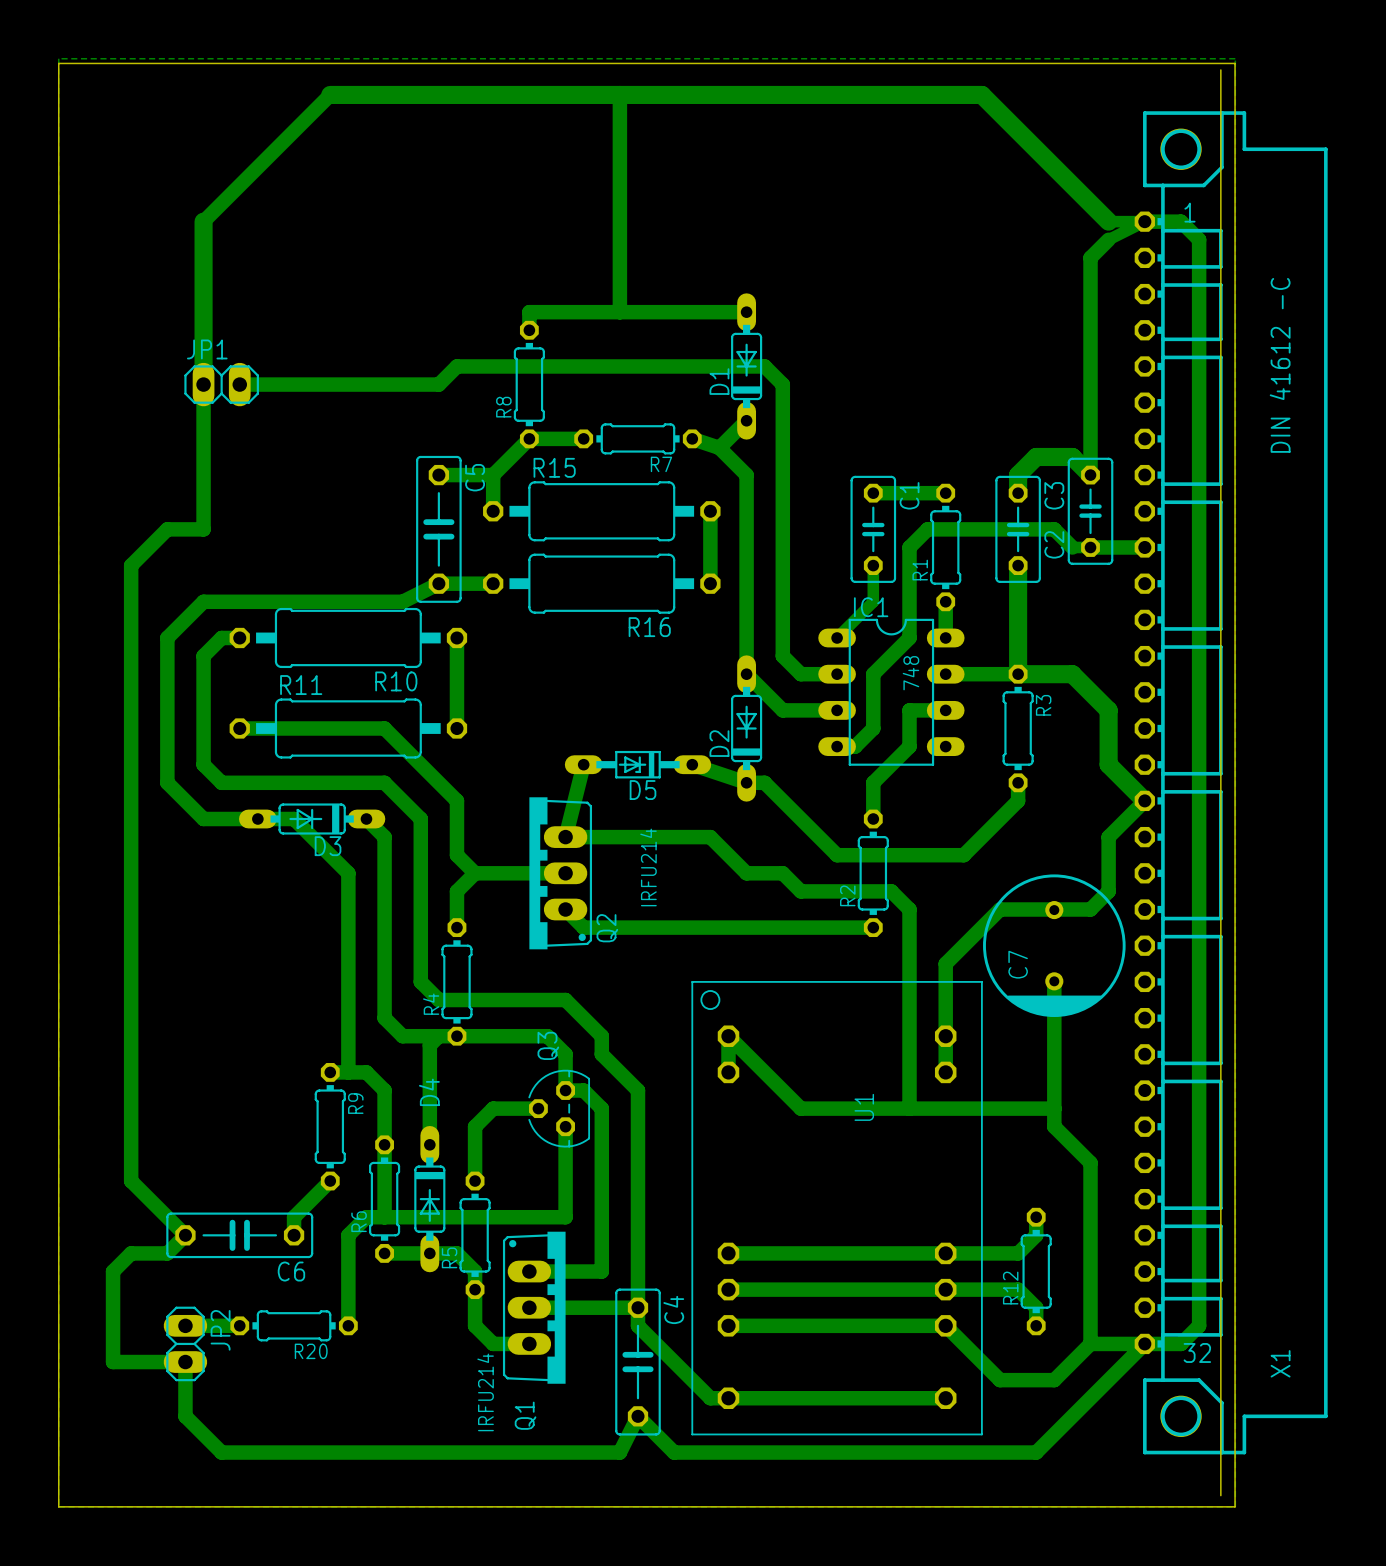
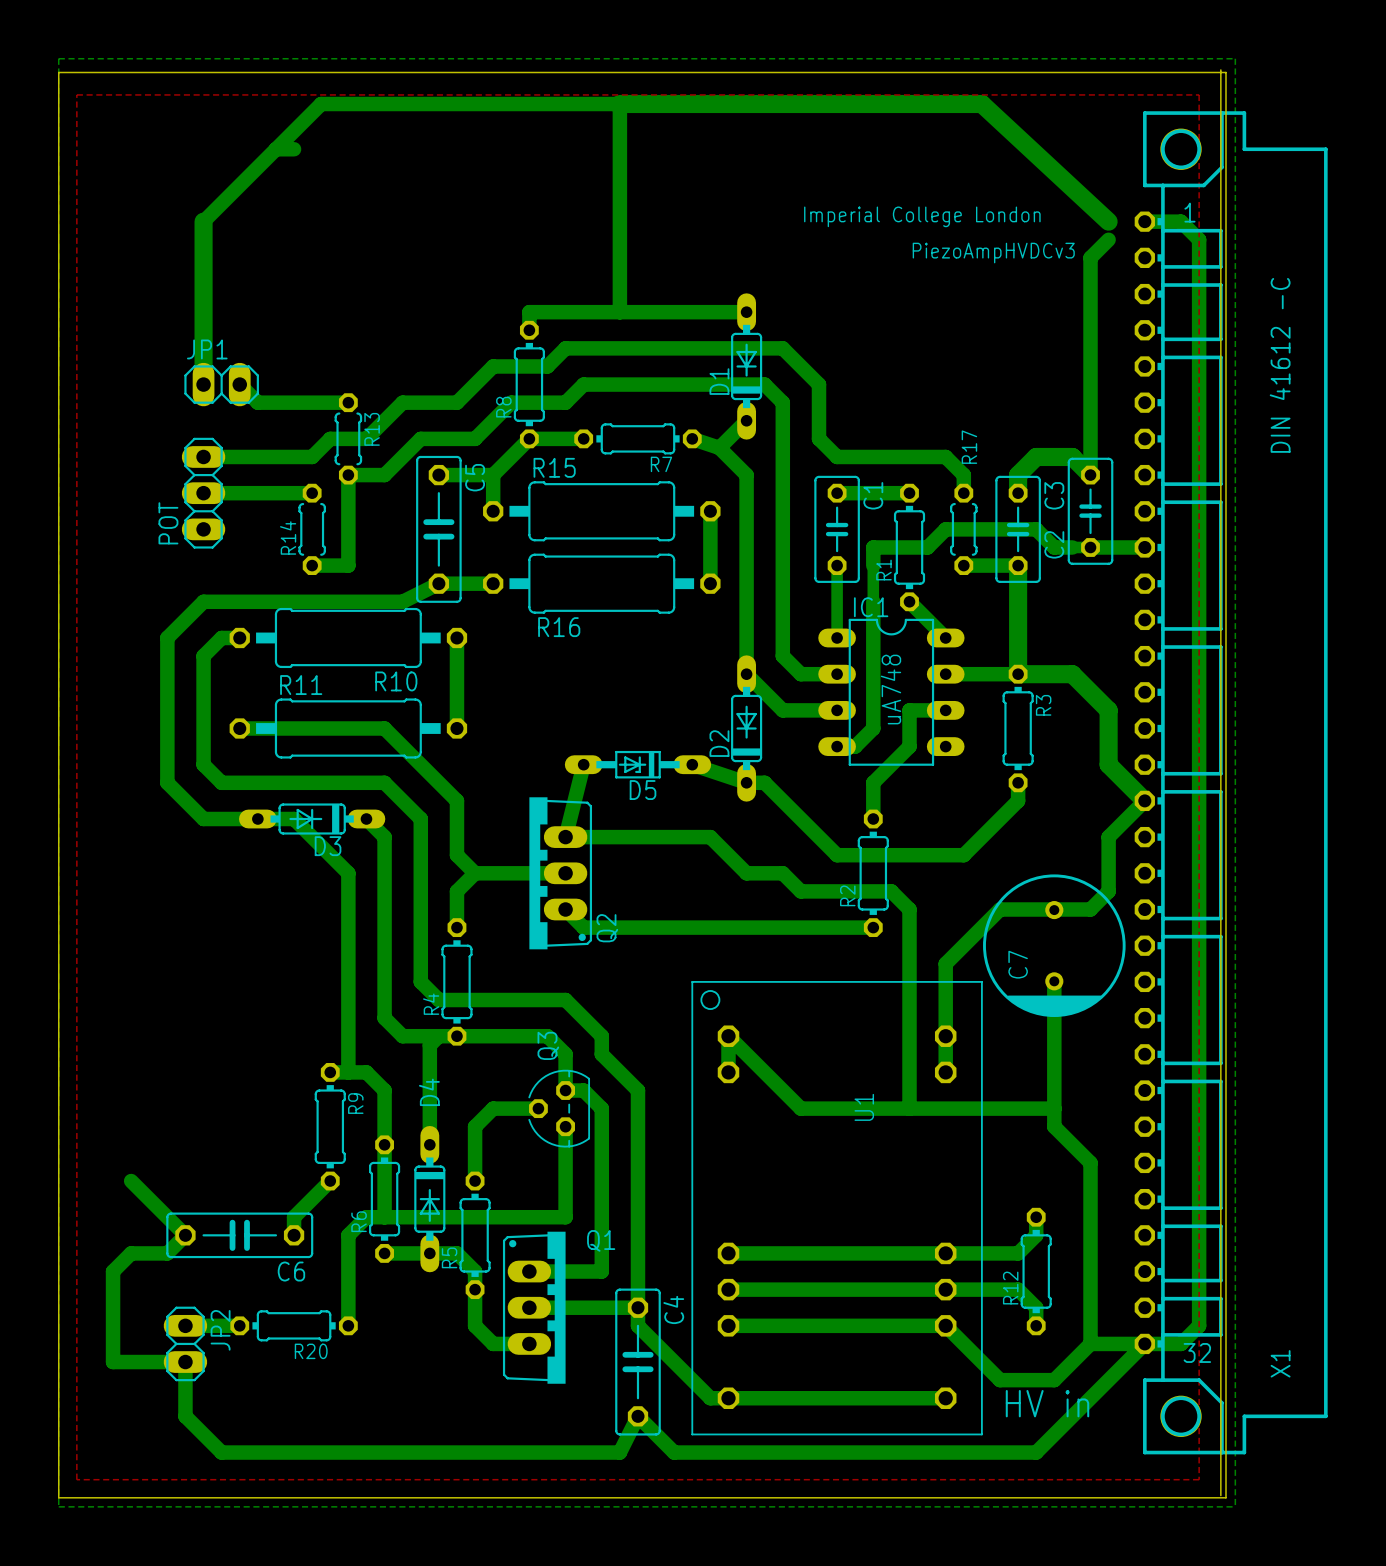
board edge: (58, 72) (58, 63) (1235, 63) (1235, 1506) (58, 1506) (58, 1497) -> (58, 72) (1225, 72) (1225, 1497) (58, 1497)
top zone outline: none -> (76, 94) (1199, 94) (1199, 1479) (76, 1479) (76, 94)
bottom track: (321, 104) (330, 94) (981, 94) (1108, 221) (1144, 221) (1108, 239) -> (321, 104) (981, 104) (1108, 221)
bottom track: none -> (275, 149) (294, 149)
text: none -> Imperial College London (922, 216)
text: none -> PiezoAmpHVDCv3 (993, 253)
bottom track: (493, 366) (456, 366) (438, 384) (239, 384) -> (493, 366) (456, 402) (402, 402) (366, 438) (330, 438) (312, 456) (203, 456)
bottom track: (547, 366) (764, 366) (782, 384) (782, 402) -> (547, 366) (565, 348) (782, 348) (819, 384) (819, 438) (837, 456) (945, 456) (963, 475) (963, 493)
bottom track: (203, 384) (203, 529) (167, 529) (131, 565) (131, 1181) -> none
bottom track: none -> (239, 384) (257, 402) (348, 402)
bottom track: none -> (782, 402) (764, 384) (583, 384) (565, 402) (511, 402) (475, 438) (420, 438) (384, 475) (348, 475) (348, 565) (312, 565)
R13: none -> (348, 438)
bottom track: none -> (203, 493) (312, 493)
POT: none -> (203, 493)
bottom track: (909, 493) (945, 493) -> (837, 493) (873, 493)
R14: none -> (312, 529)
C1 position: (873, 529) -> (837, 529)
bottom track: (945, 529) (927, 529) (909, 547) (909, 637) (873, 674) -> (945, 529) (927, 547) (873, 547) (873, 565)
R17: none -> (963, 529)
bottom track: (1036, 529) (1054, 529) (1072, 547) -> (1036, 529) (1054, 547) (1072, 547)
R1 position: (945, 547) -> (909, 547)
bottom track: none -> (837, 565) (837, 637)
bottom track: none -> (963, 565) (1018, 565)
bottom track: (873, 601) (837, 637) -> (873, 601) (873, 674)
bottom track: (945, 601) (945, 637) -> (909, 601) (945, 637)
R16 name position: R16 (649, 627) -> R16 (559, 627)
text: 748 (910, 673) -> uA748 (890, 689)
text: IRFU214 (648, 867) -> none
text: IRFU214 (485, 1392) -> none
text: none -> HV in (1047, 1403)
Q1 name rotation: 0° (525, 1415) -> 90° clockwise (601, 1240)
Q1 name position: Q1 (525, 1415) -> Q1 (601, 1240)

